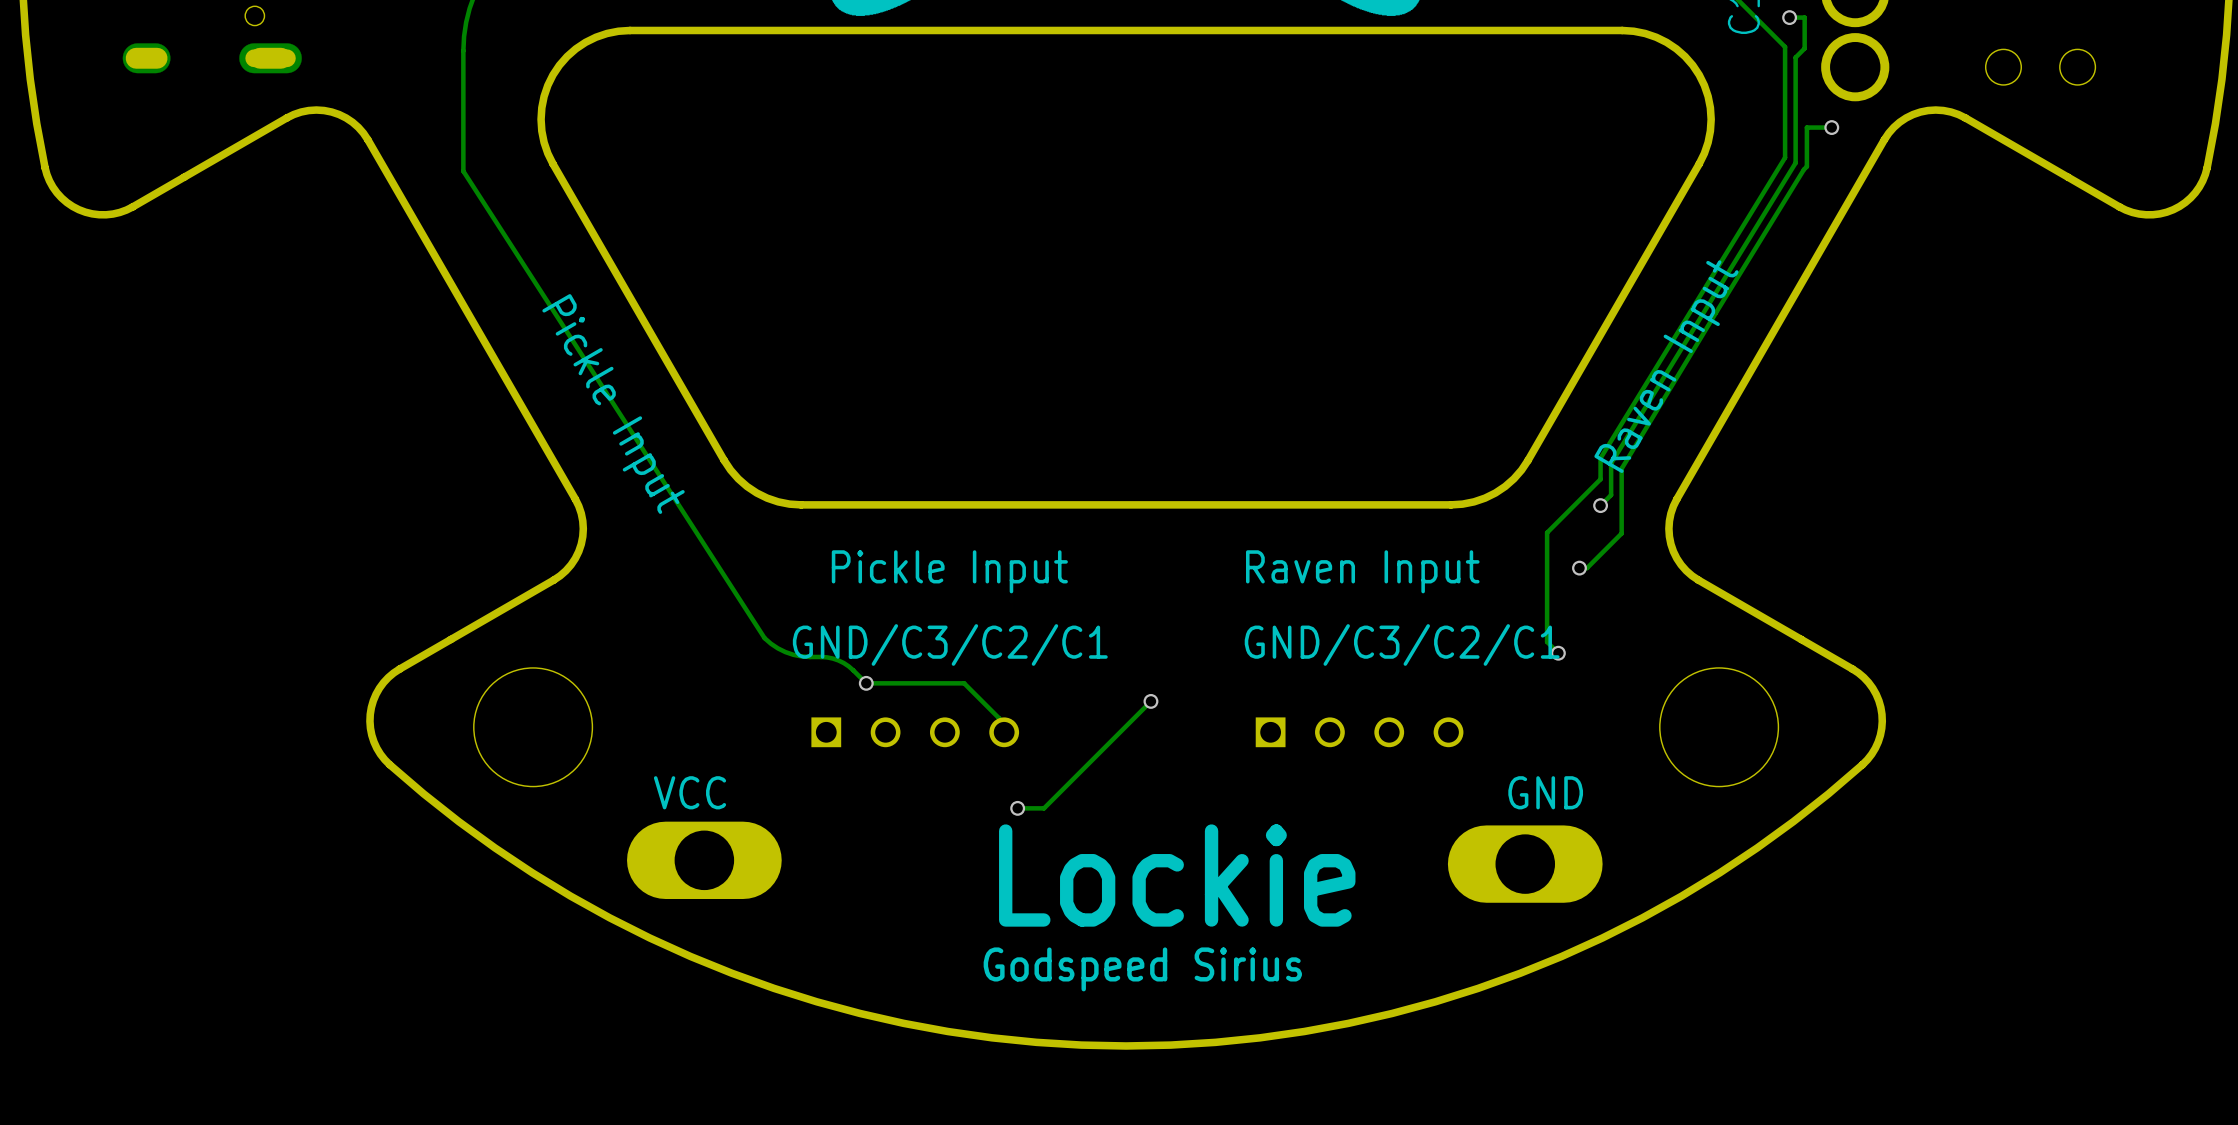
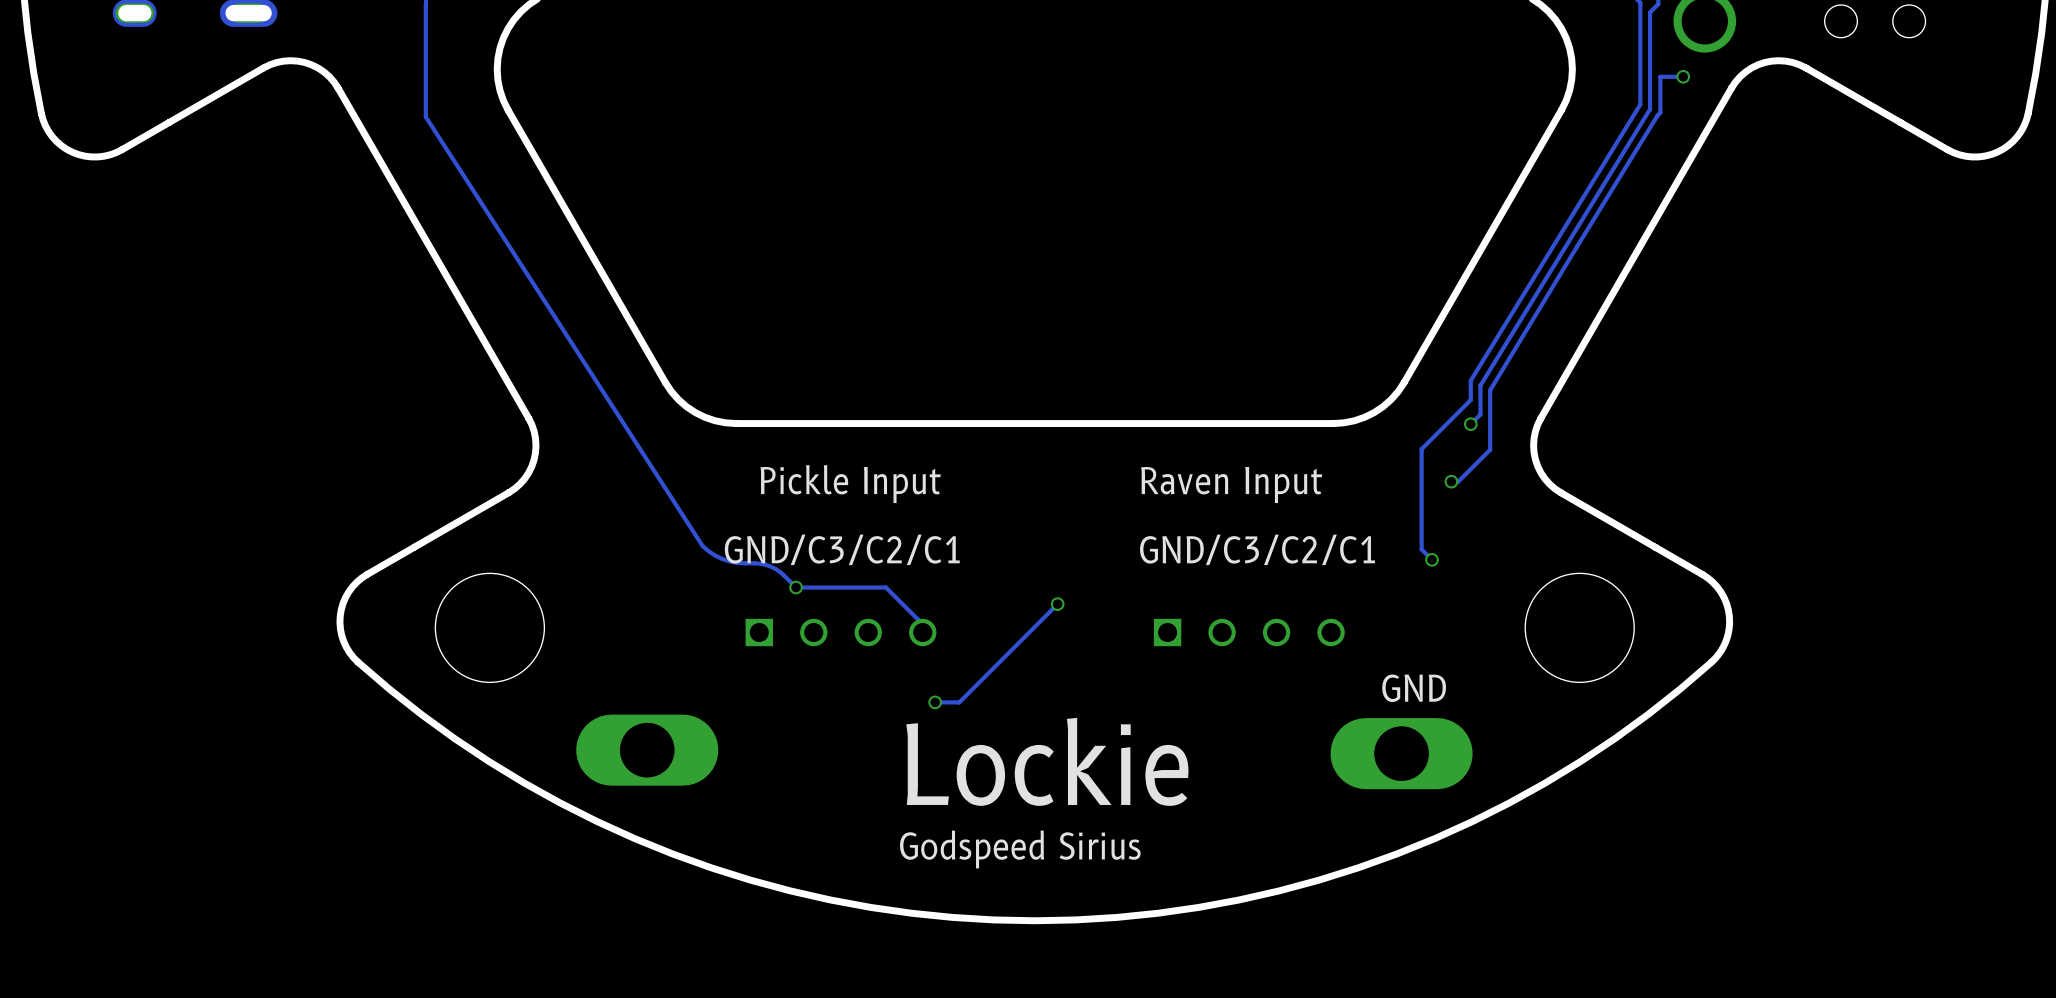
text: Raven Input (1666, 366) -> none
text: Pickle Input (613, 404) -> none
text: VCC (690, 792) -> none

